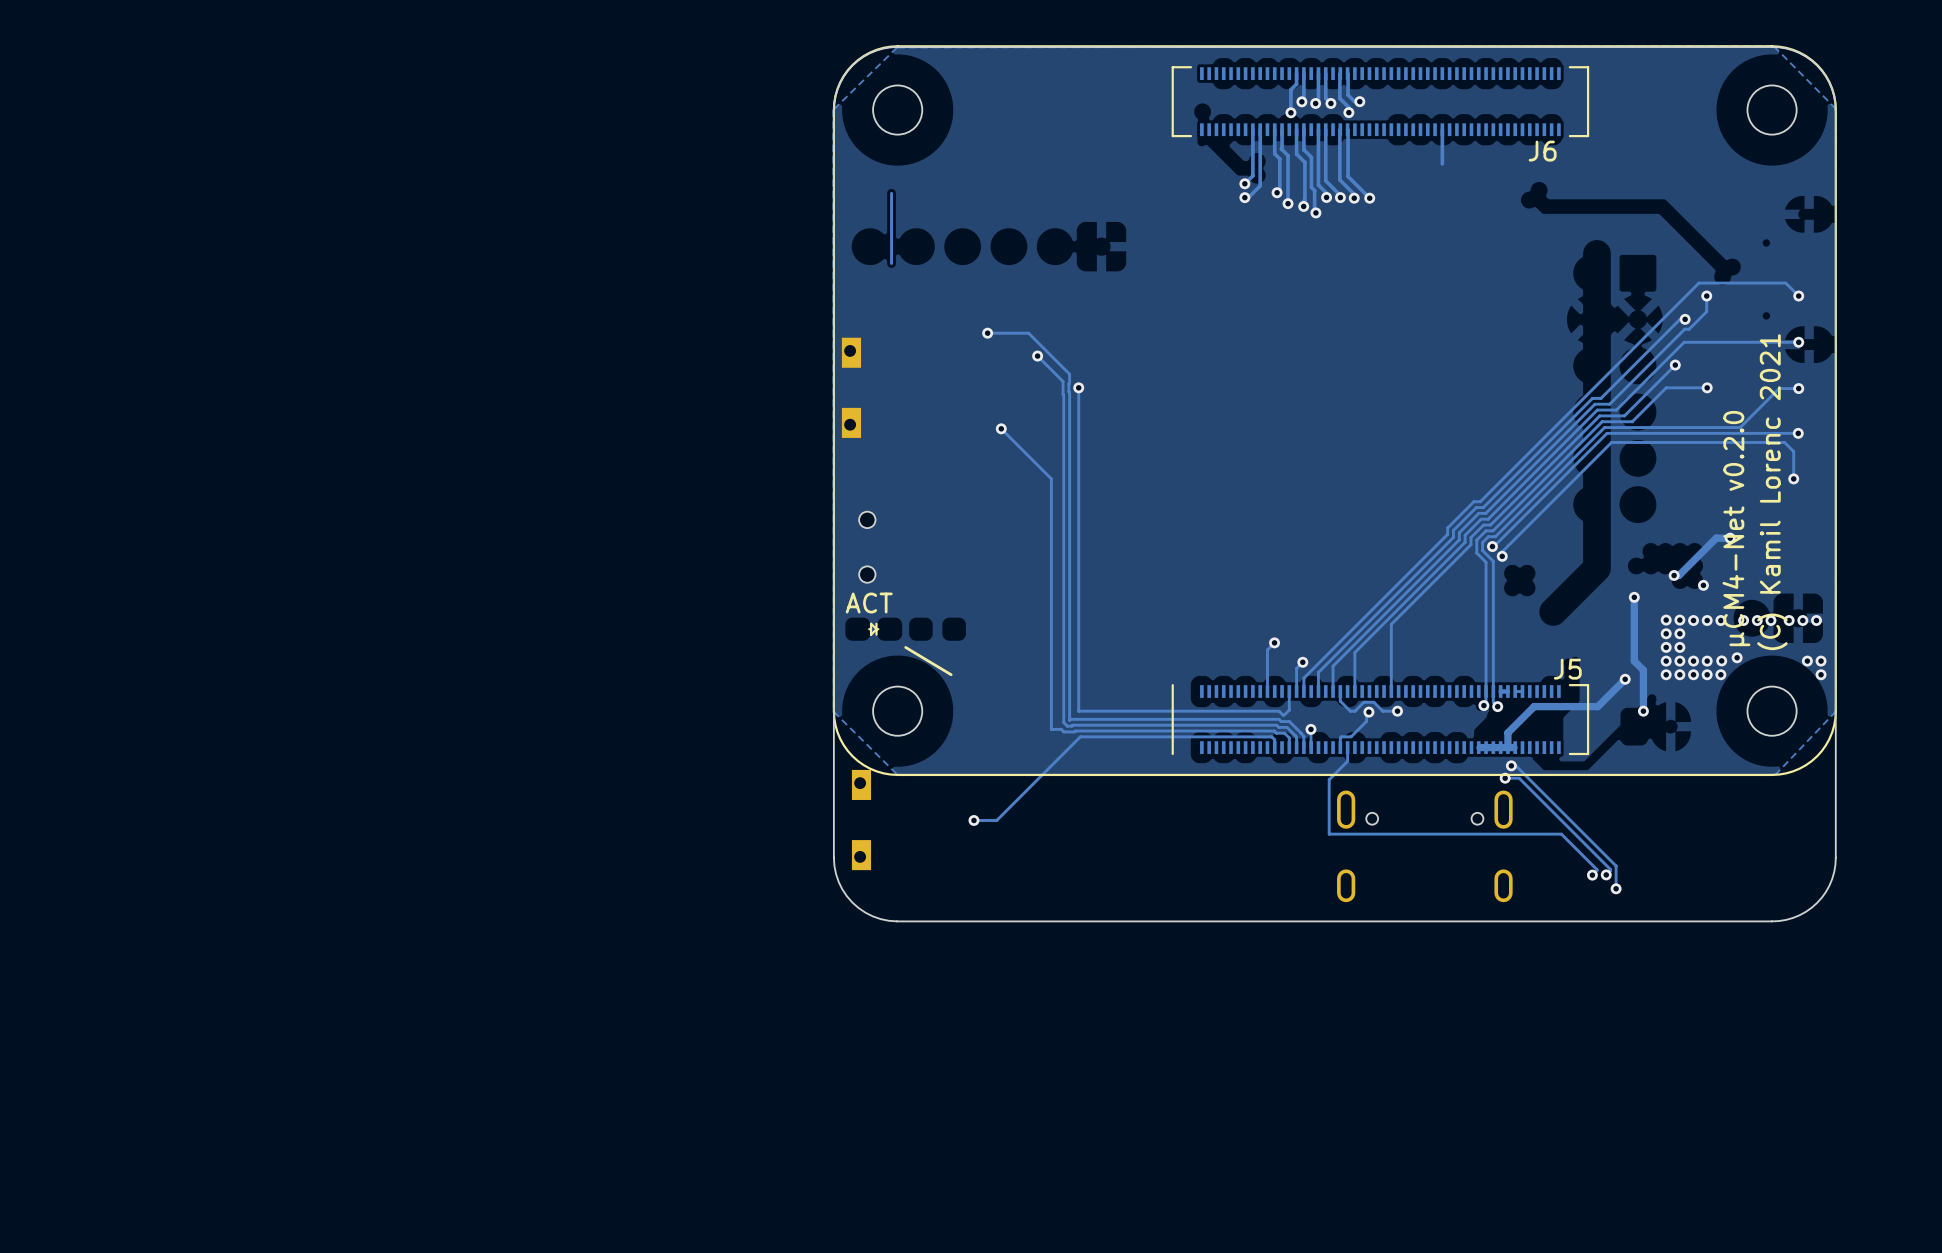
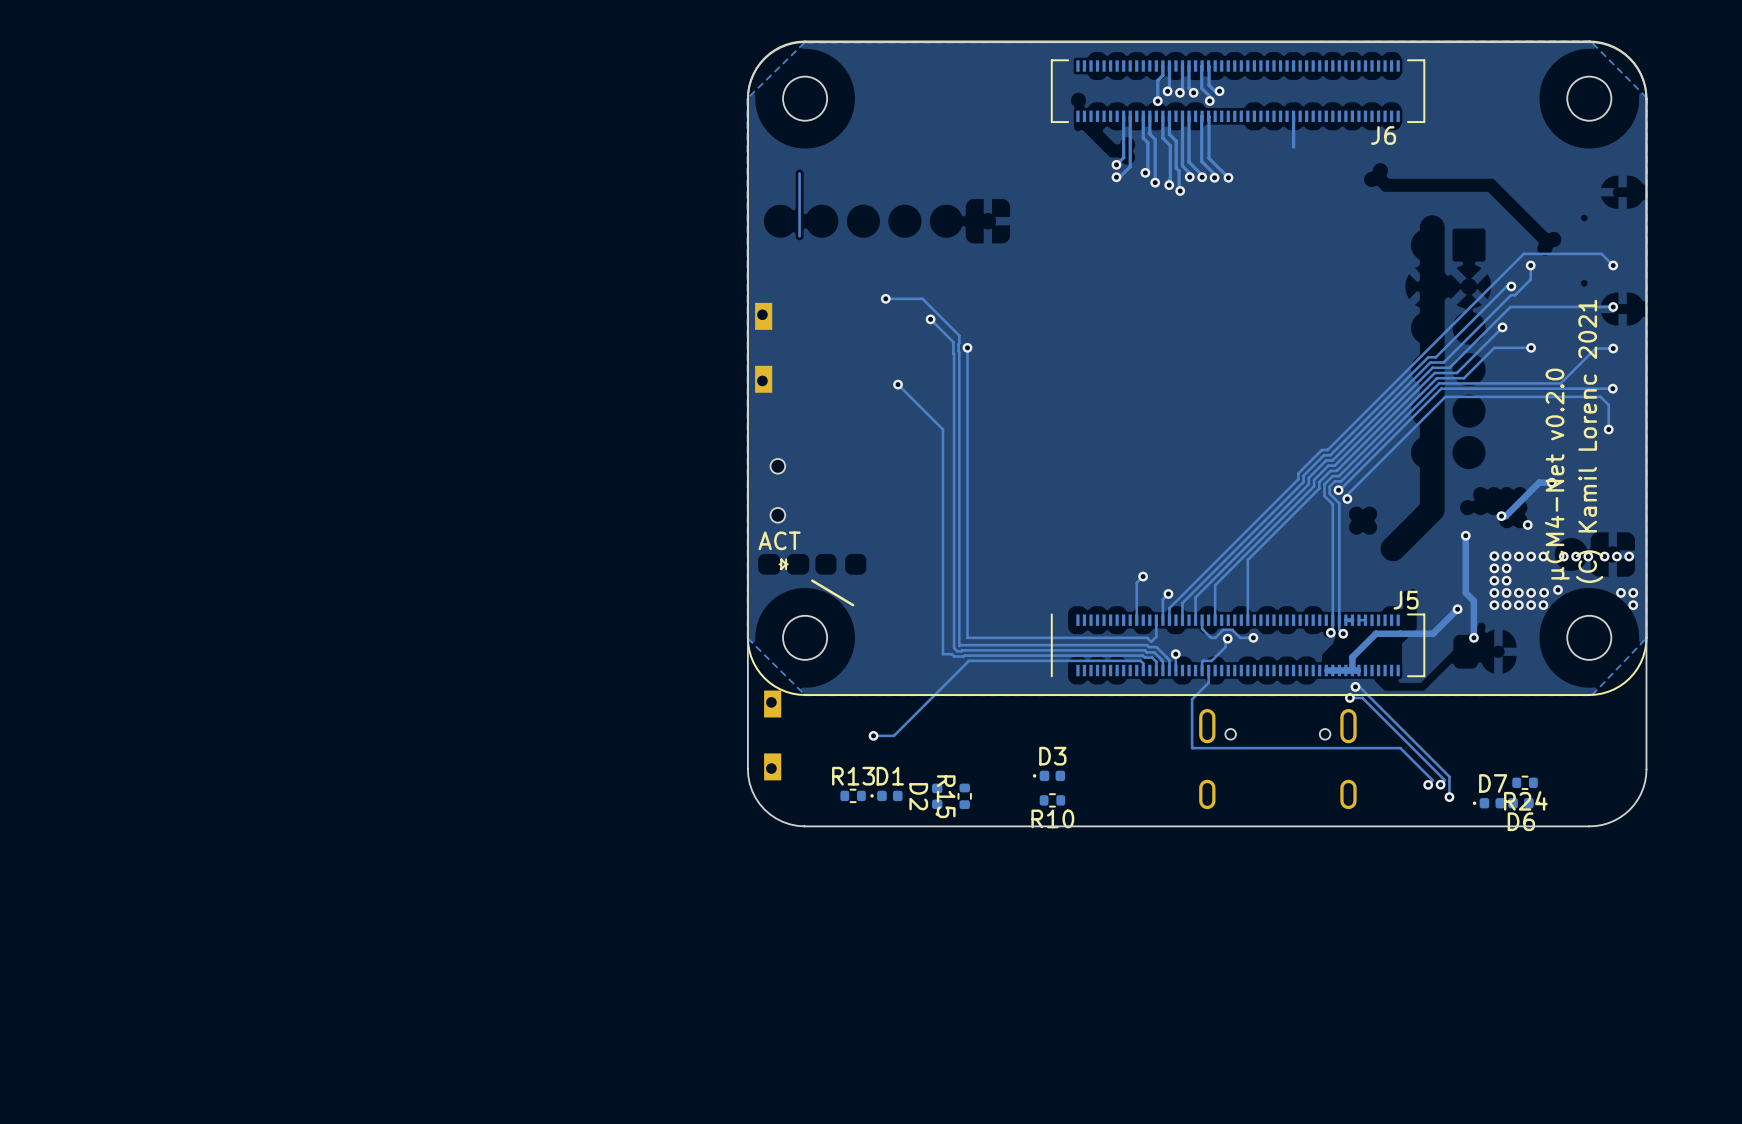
D3: none -> (1049, 775)
R24: none -> (1525, 782)
R13: none -> (853, 795)
D1: none -> (886, 795)
R15: none -> (964, 796)
D2: none -> (937, 799)
R10: none -> (1052, 800)
D7: none -> (1489, 803)
D6: none -> (1524, 803)

